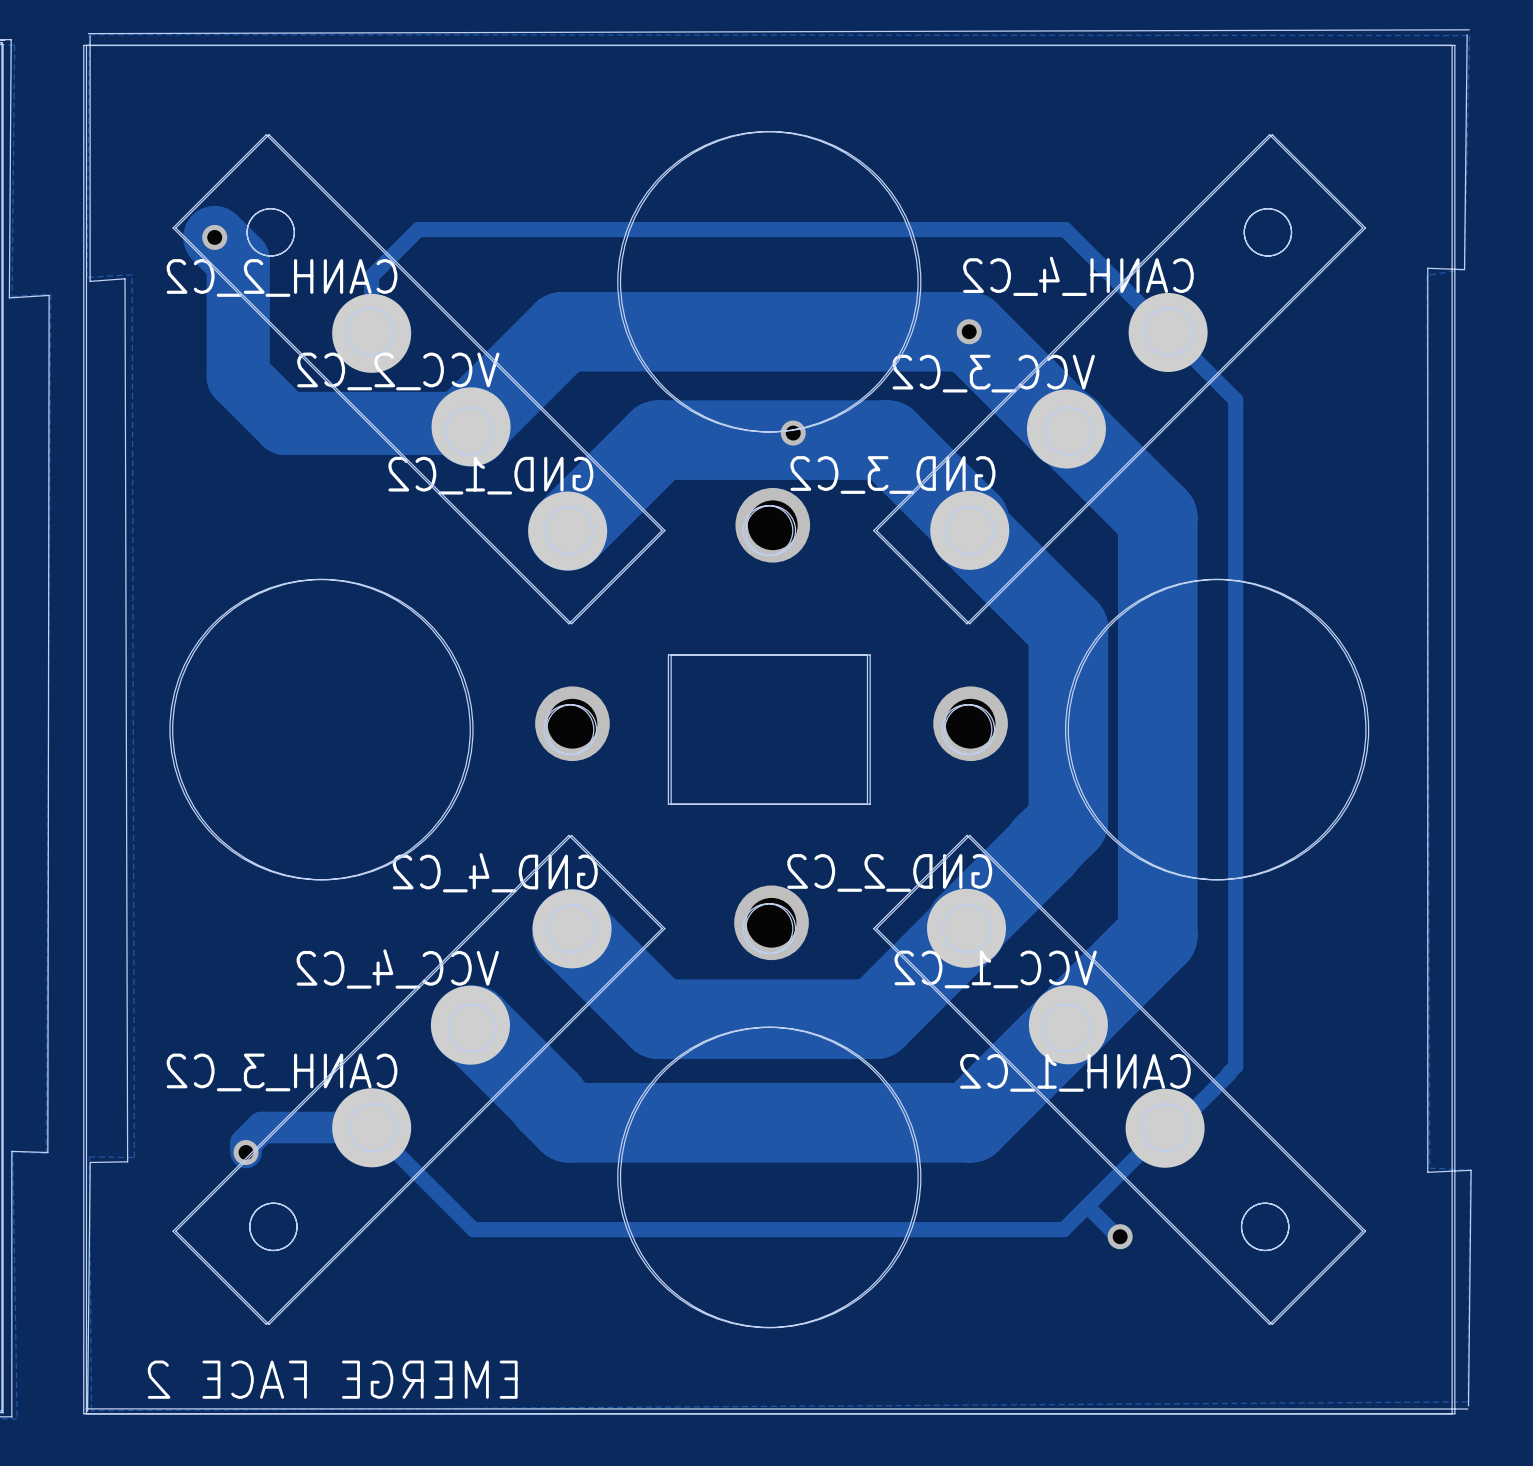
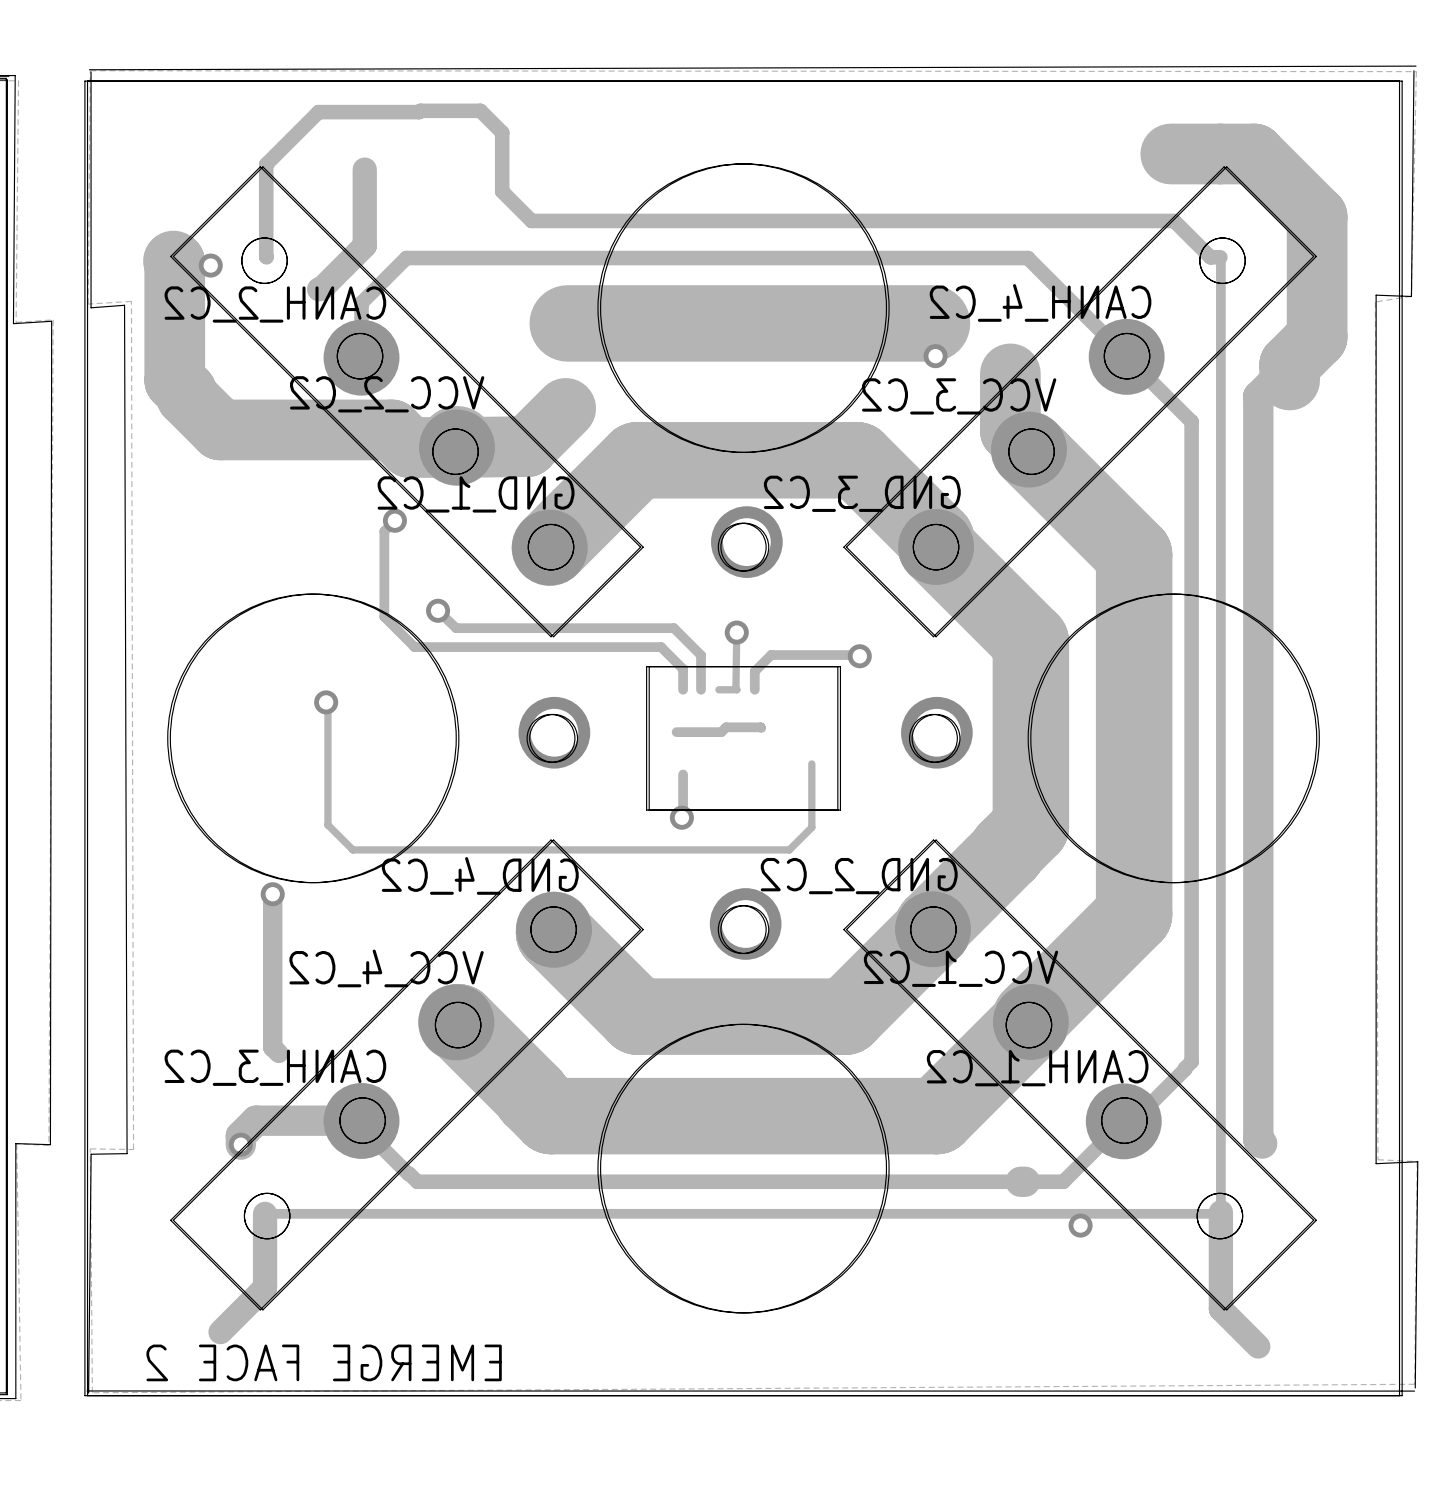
track: none -> (1170, 153) (1254, 153) (1317, 216) (1317, 337) (1289, 364) (1289, 380)
track: none -> (364, 169) (364, 245) (319, 289)
track: none -> (265, 256) (266, 164) (318, 112) (480, 110) (502, 132) (502, 191) (531, 220) (1174, 220) (1210, 257) (1220, 257) (1220, 1212)
track: none -> (173, 261) (174, 380) (186, 392) (186, 396) (220, 429) (391, 429) (409, 447) (527, 446) (565, 408)
track: (214, 237) (238, 260) (238, 376) (285, 423) (471, 423) (562, 331) (969, 331) (1047, 409) -> (1010, 373) (1010, 430)
track: none -> (932, 323) (567, 323)
track: none -> (1301, 380) (1274, 380) (1258, 396) (1258, 1139) (1262, 1143)
track: (1066, 429) (1068, 429) (1157, 517) (1157, 935) (1068, 1024) -> (1037, 458) (1029, 449) (1134, 554) (1134, 914) (1030, 1017) (1030, 1021)
via: (793, 433) -> none
track: none -> (394, 520) (384, 531) (384, 616) (414, 647) (661, 647) (683, 669) (683, 689)
via: none -> (394, 520)
track: none -> (438, 610) (456, 628) (673, 628) (701, 655) (701, 689)
via: none -> (438, 610)
track: none -> (736, 632) (736, 689) (718, 689)
via: none -> (736, 632)
track: none -> (859, 656) (771, 655) (754, 671) (754, 689)
via: none -> (859, 656)
track: none -> (326, 702) (327, 704) (327, 825) (352, 849) (789, 849) (811, 827) (811, 763)
via: none -> (326, 702)
track: none -> (761, 727) (726, 727) (721, 732) (676, 732)
track: none -> (683, 774) (681, 817)
via: none -> (681, 817)
track: none -> (272, 894) (272, 1047) (278, 1053)
via: none -> (272, 894)
track: (371, 1127) (473, 1229) (1063, 1229) (1102, 1191) -> (361, 1120) (361, 1127) (417, 1181) (1063, 1181)
track: (1087, 1206) (1117, 1236) (1120, 1236) -> none
track: none -> (1220, 1212) (1219, 1213) (265, 1213) (265, 1287) (220, 1332)
track: none -> (1220, 1212) (1220, 1309) (1258, 1346)

